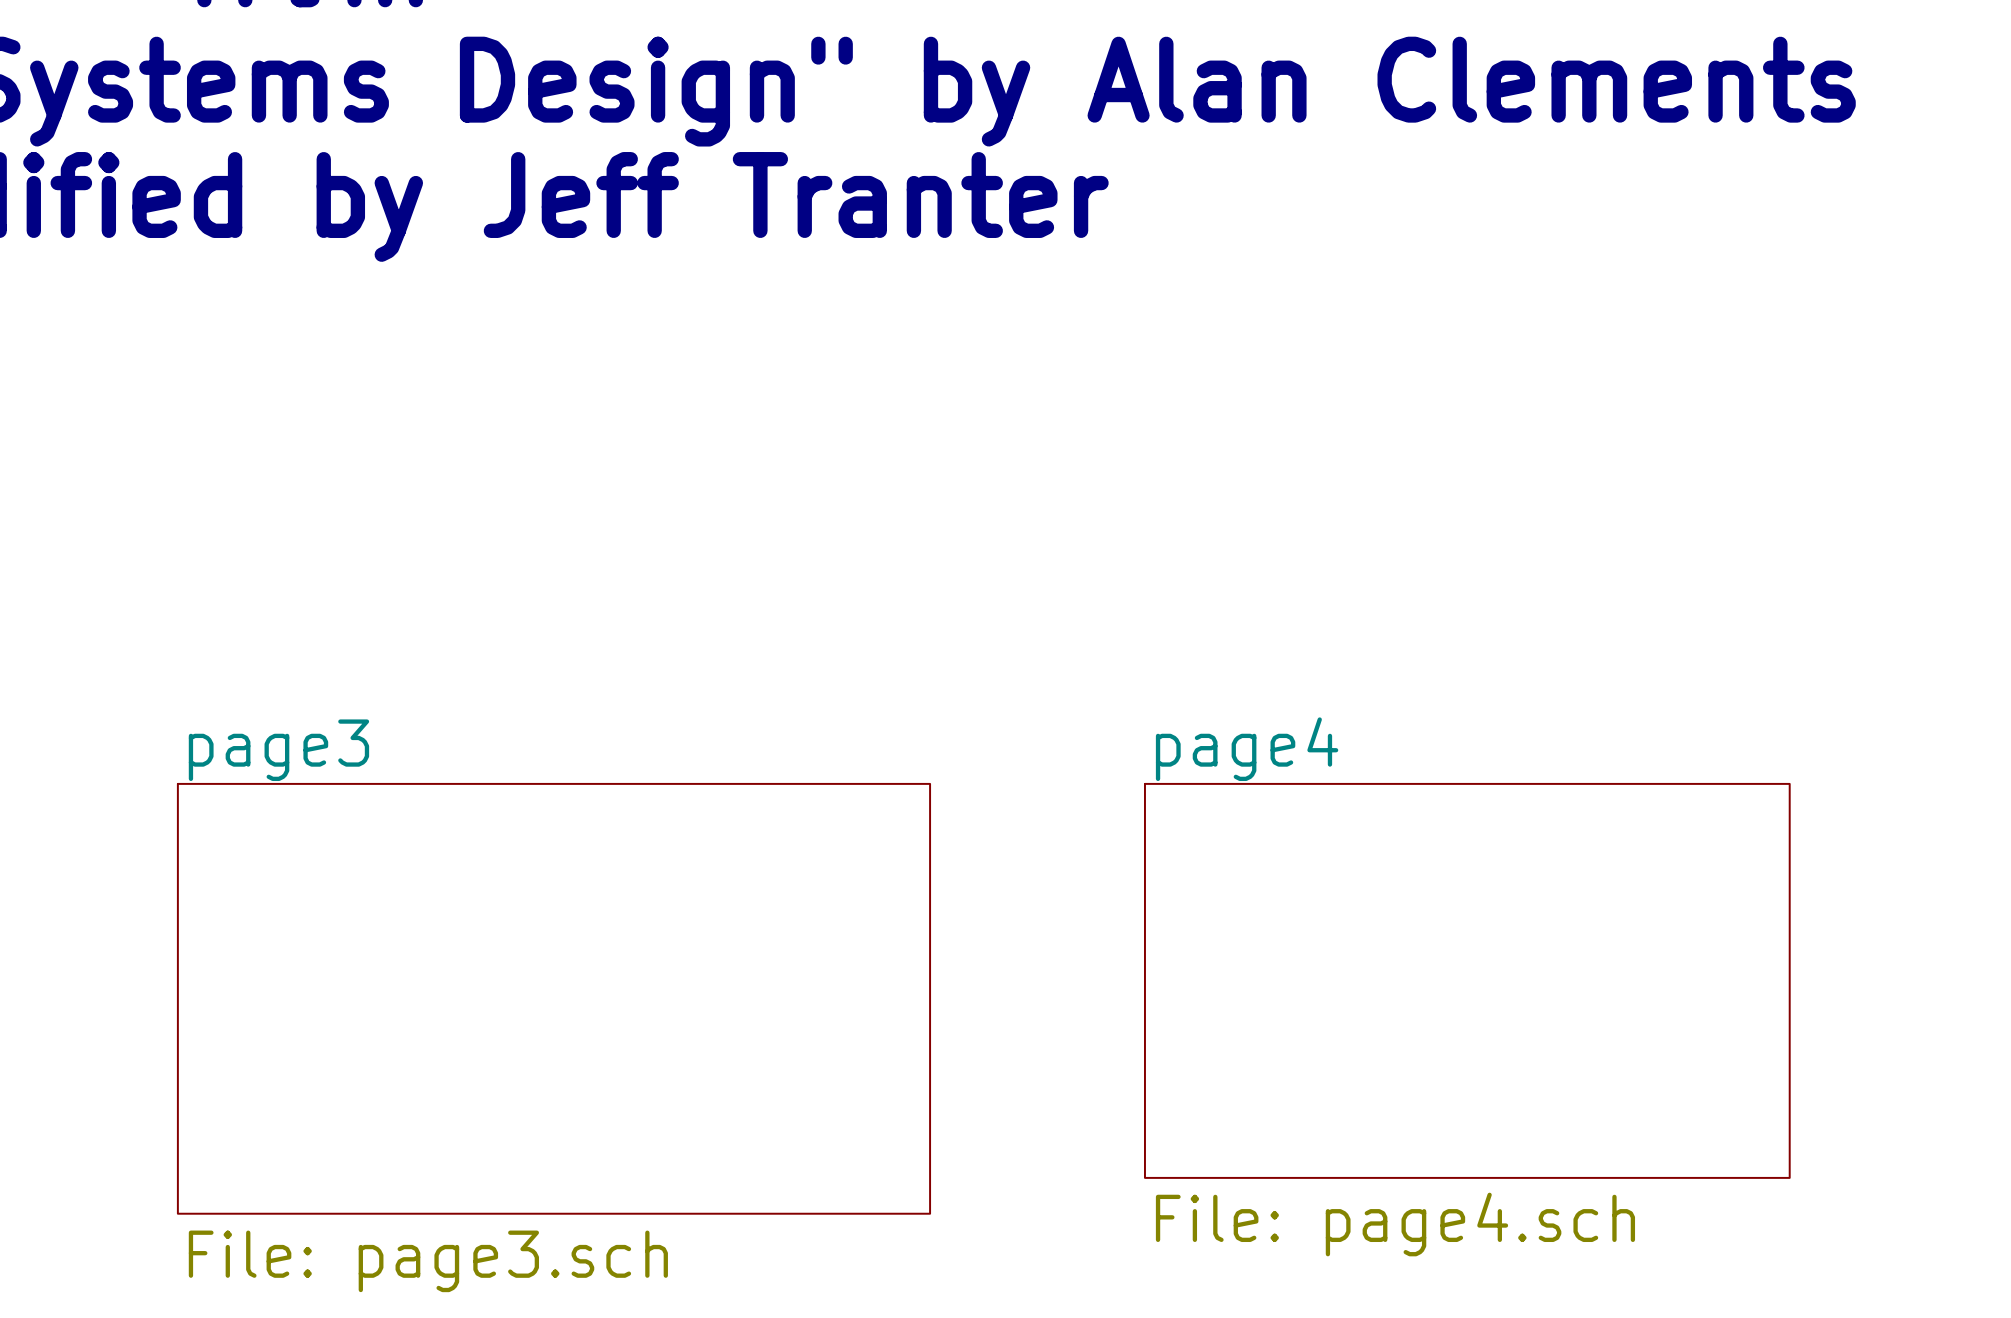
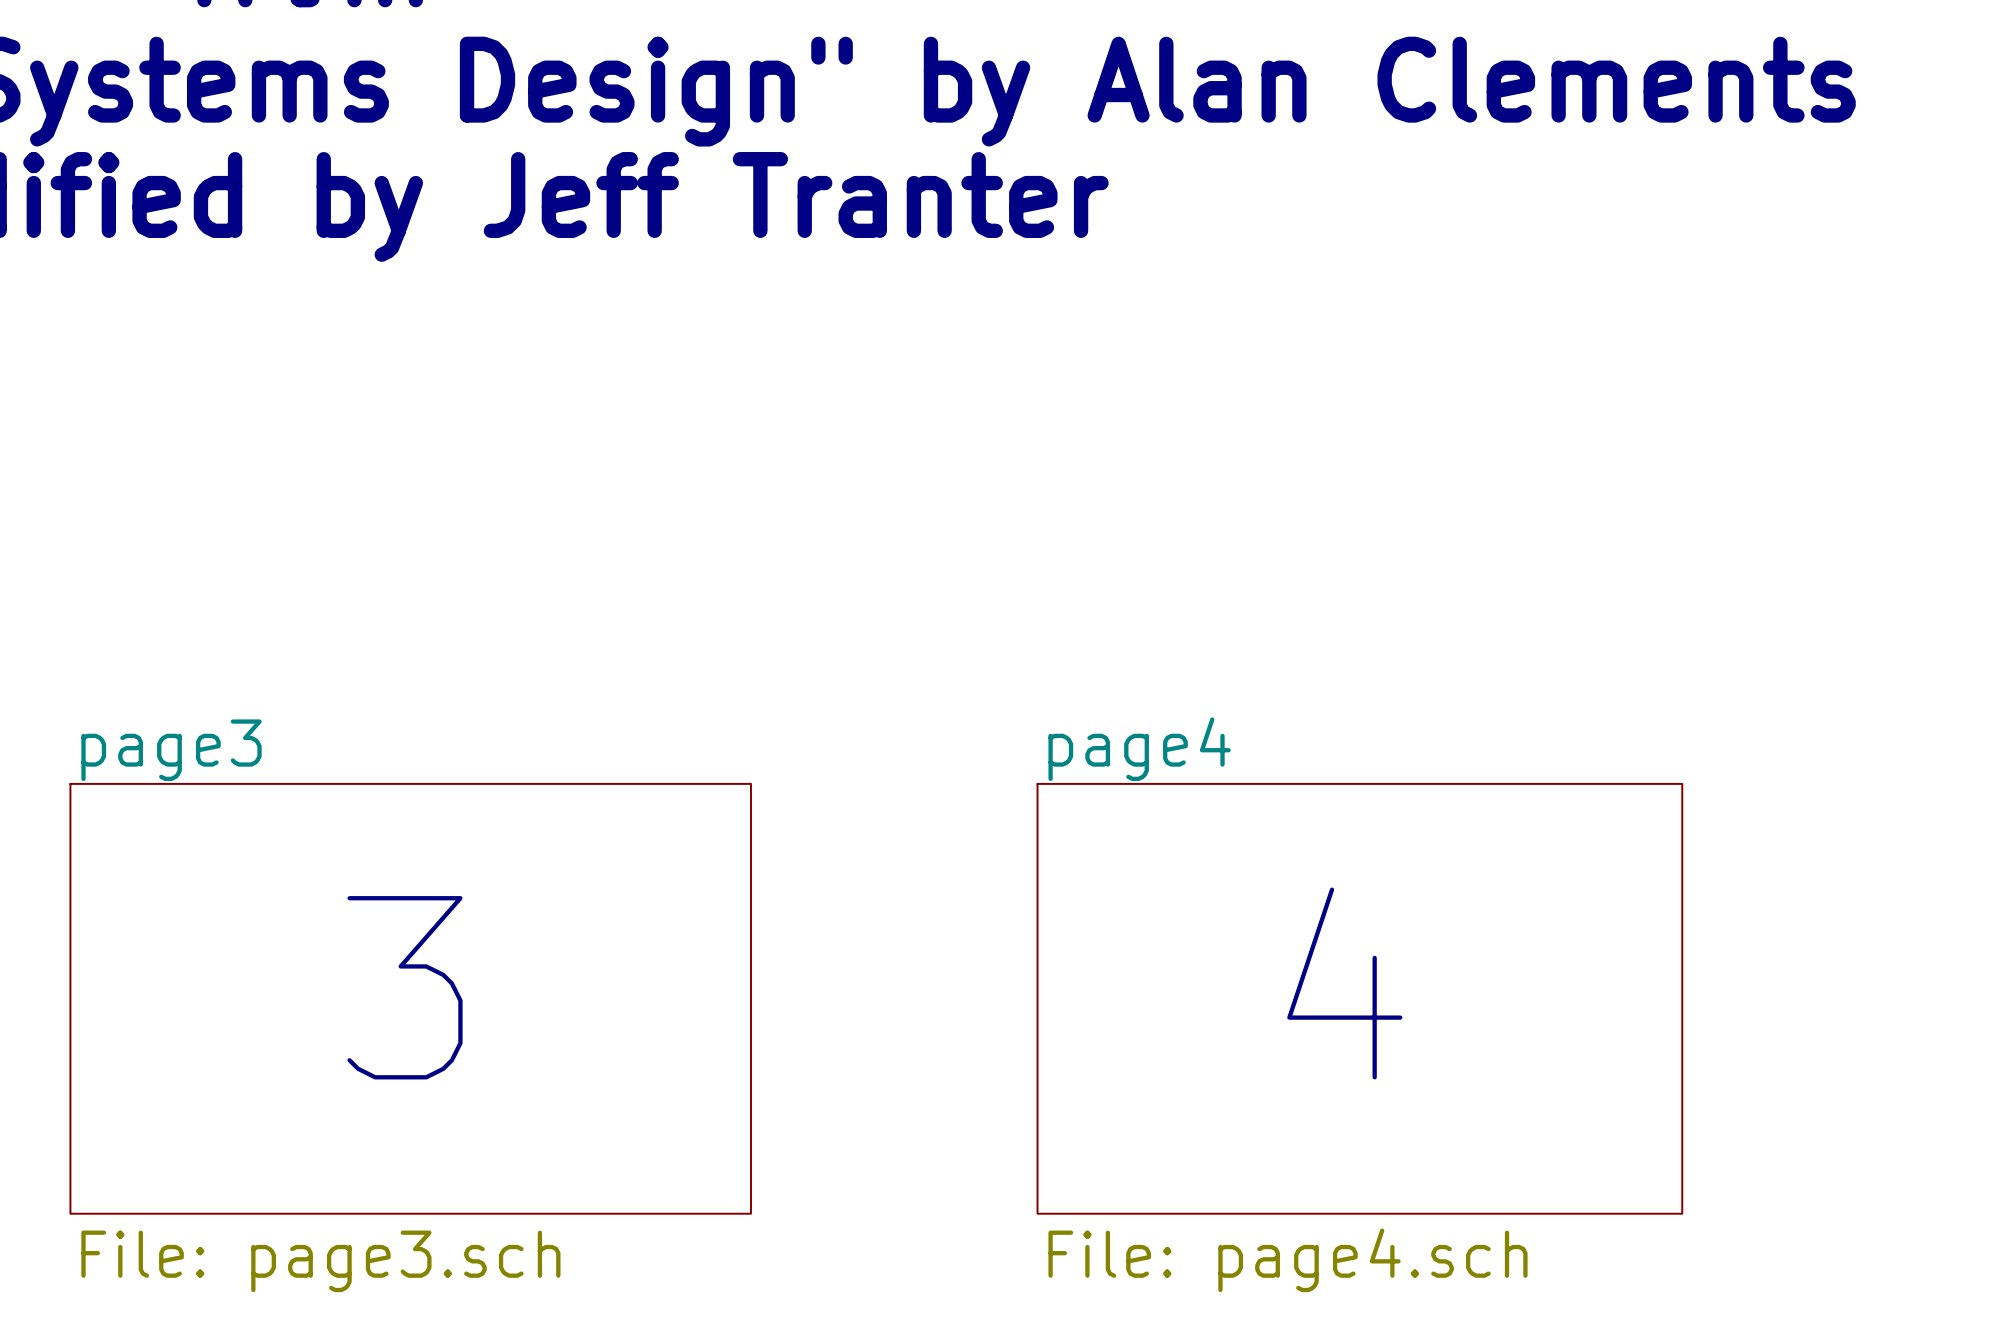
sheet page3 shape: [177, 783, 931, 1214] -> [70, 783, 751, 1214]
sheet page4 shape: [1144, 783, 1790, 1178] -> [1037, 783, 1683, 1214]
text: none -> 4 (1344, 983)
text: none -> 3 (405, 987)

